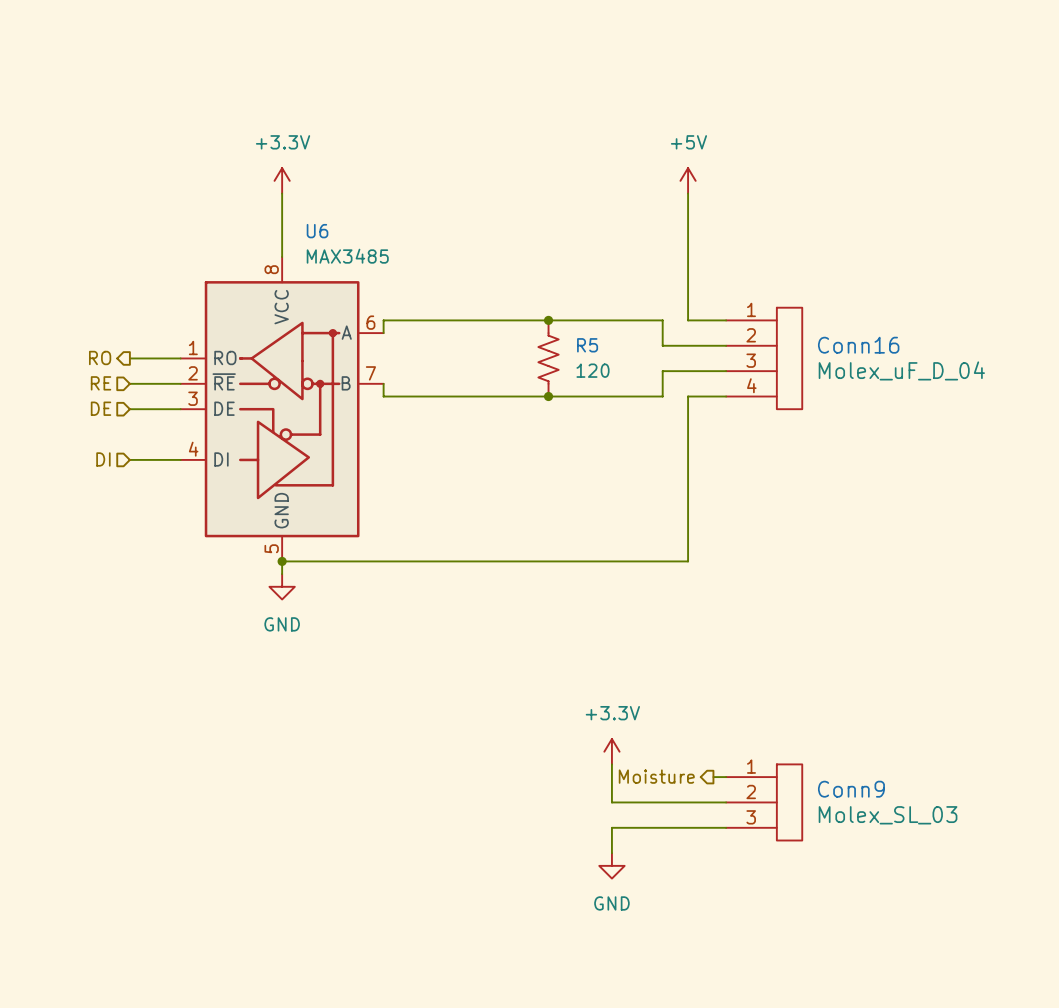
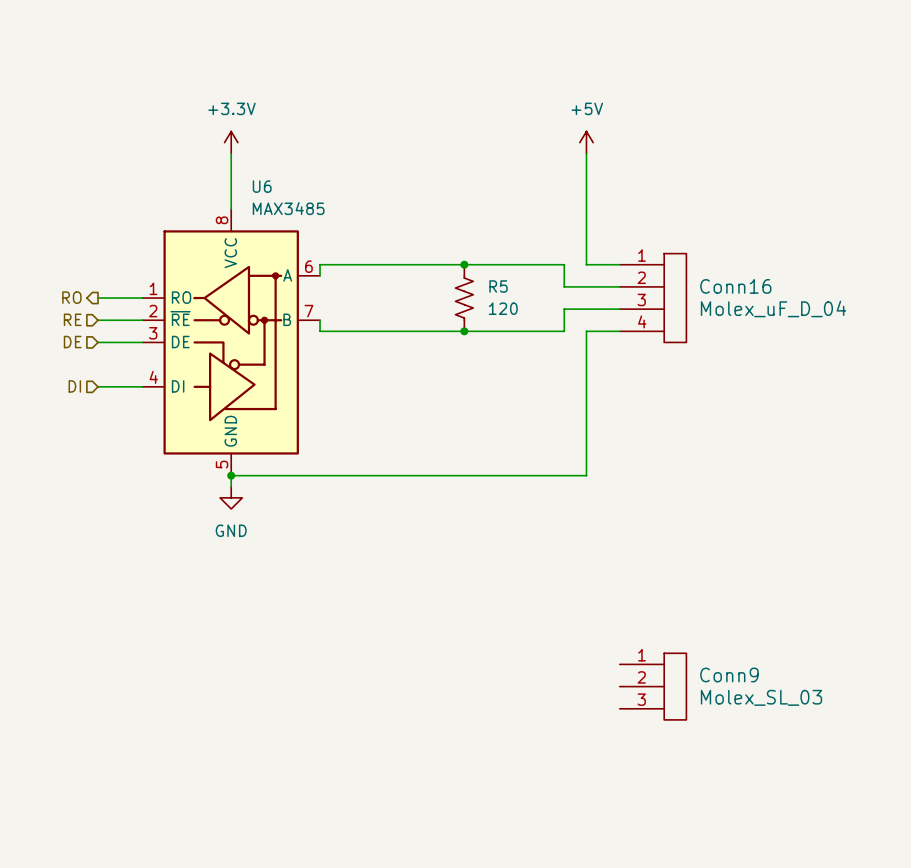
power symbol: +3.3V (611, 751) -> none
wire: (611, 764) (611, 802) (726, 802) -> none
hierarchical label: Moisture (656, 776) -> none
wire: (713, 777) (726, 777) -> none
wire: (726, 827) (611, 827) (611, 853) -> none
power symbol: GND (611, 865) -> none

